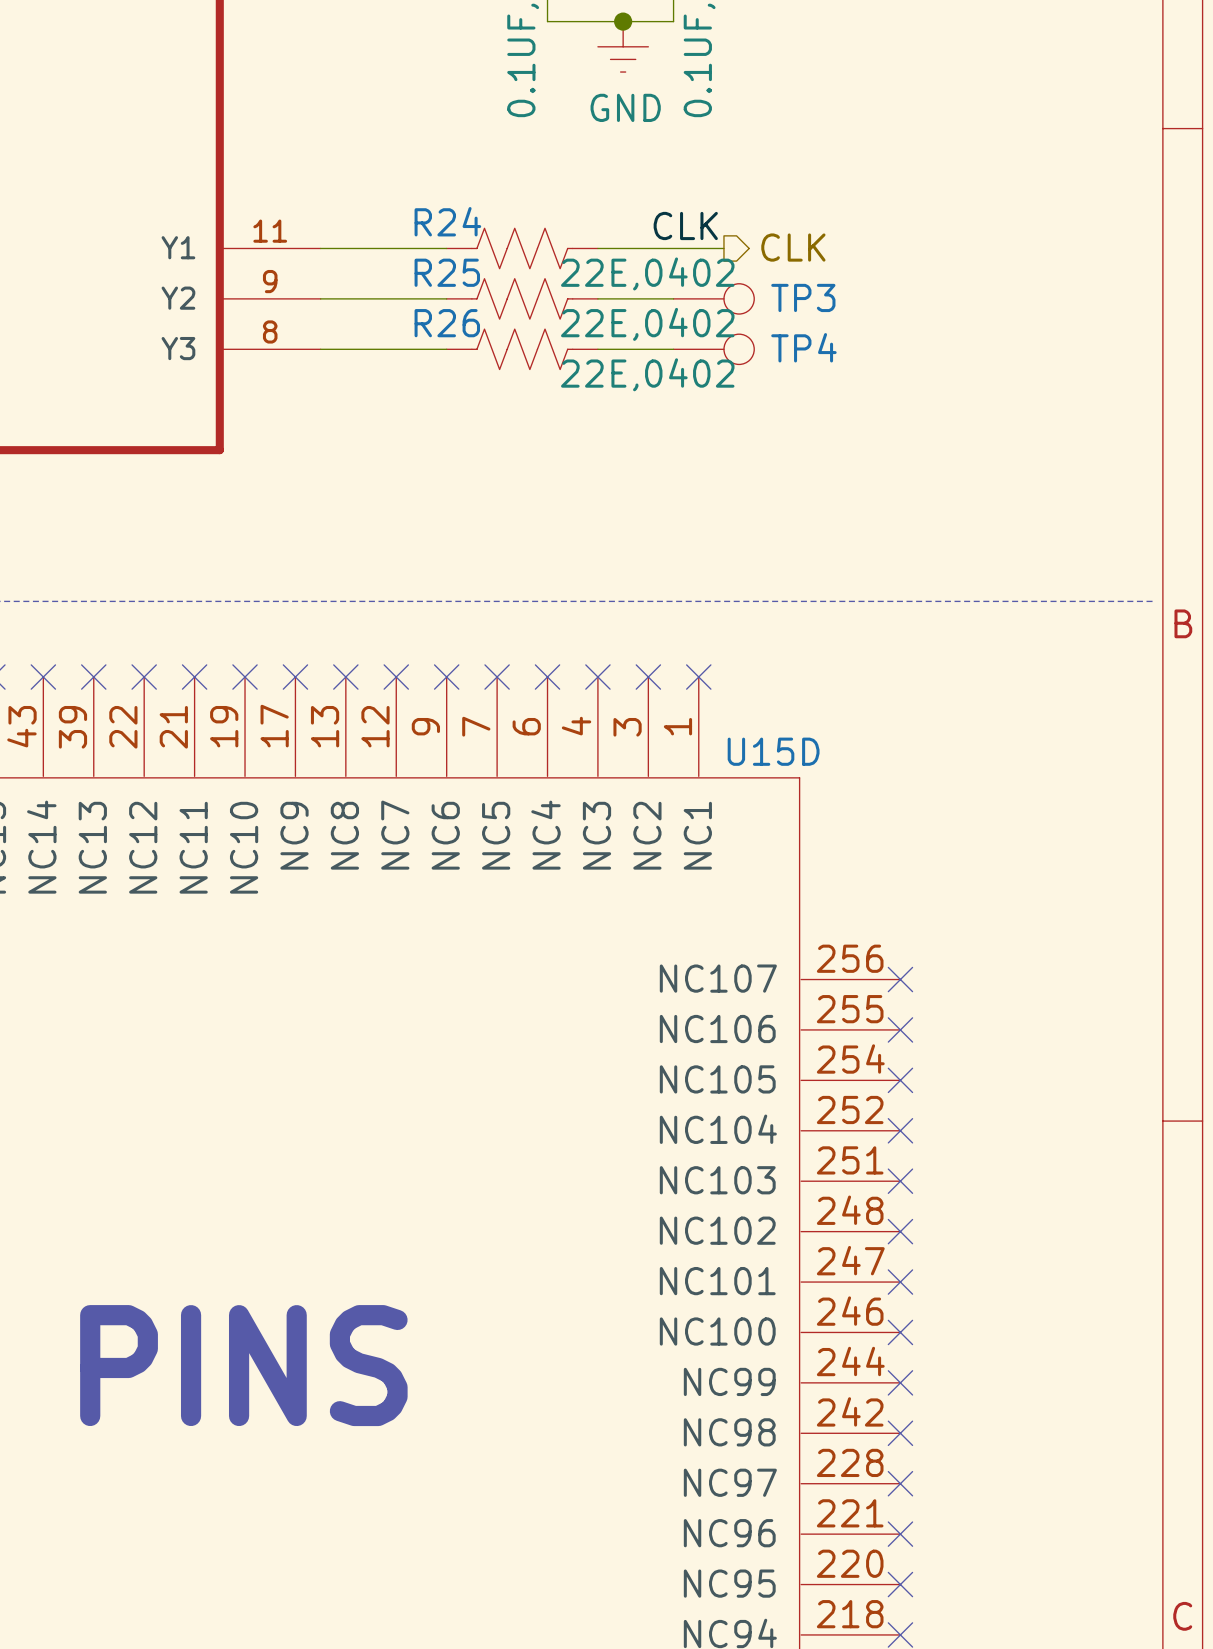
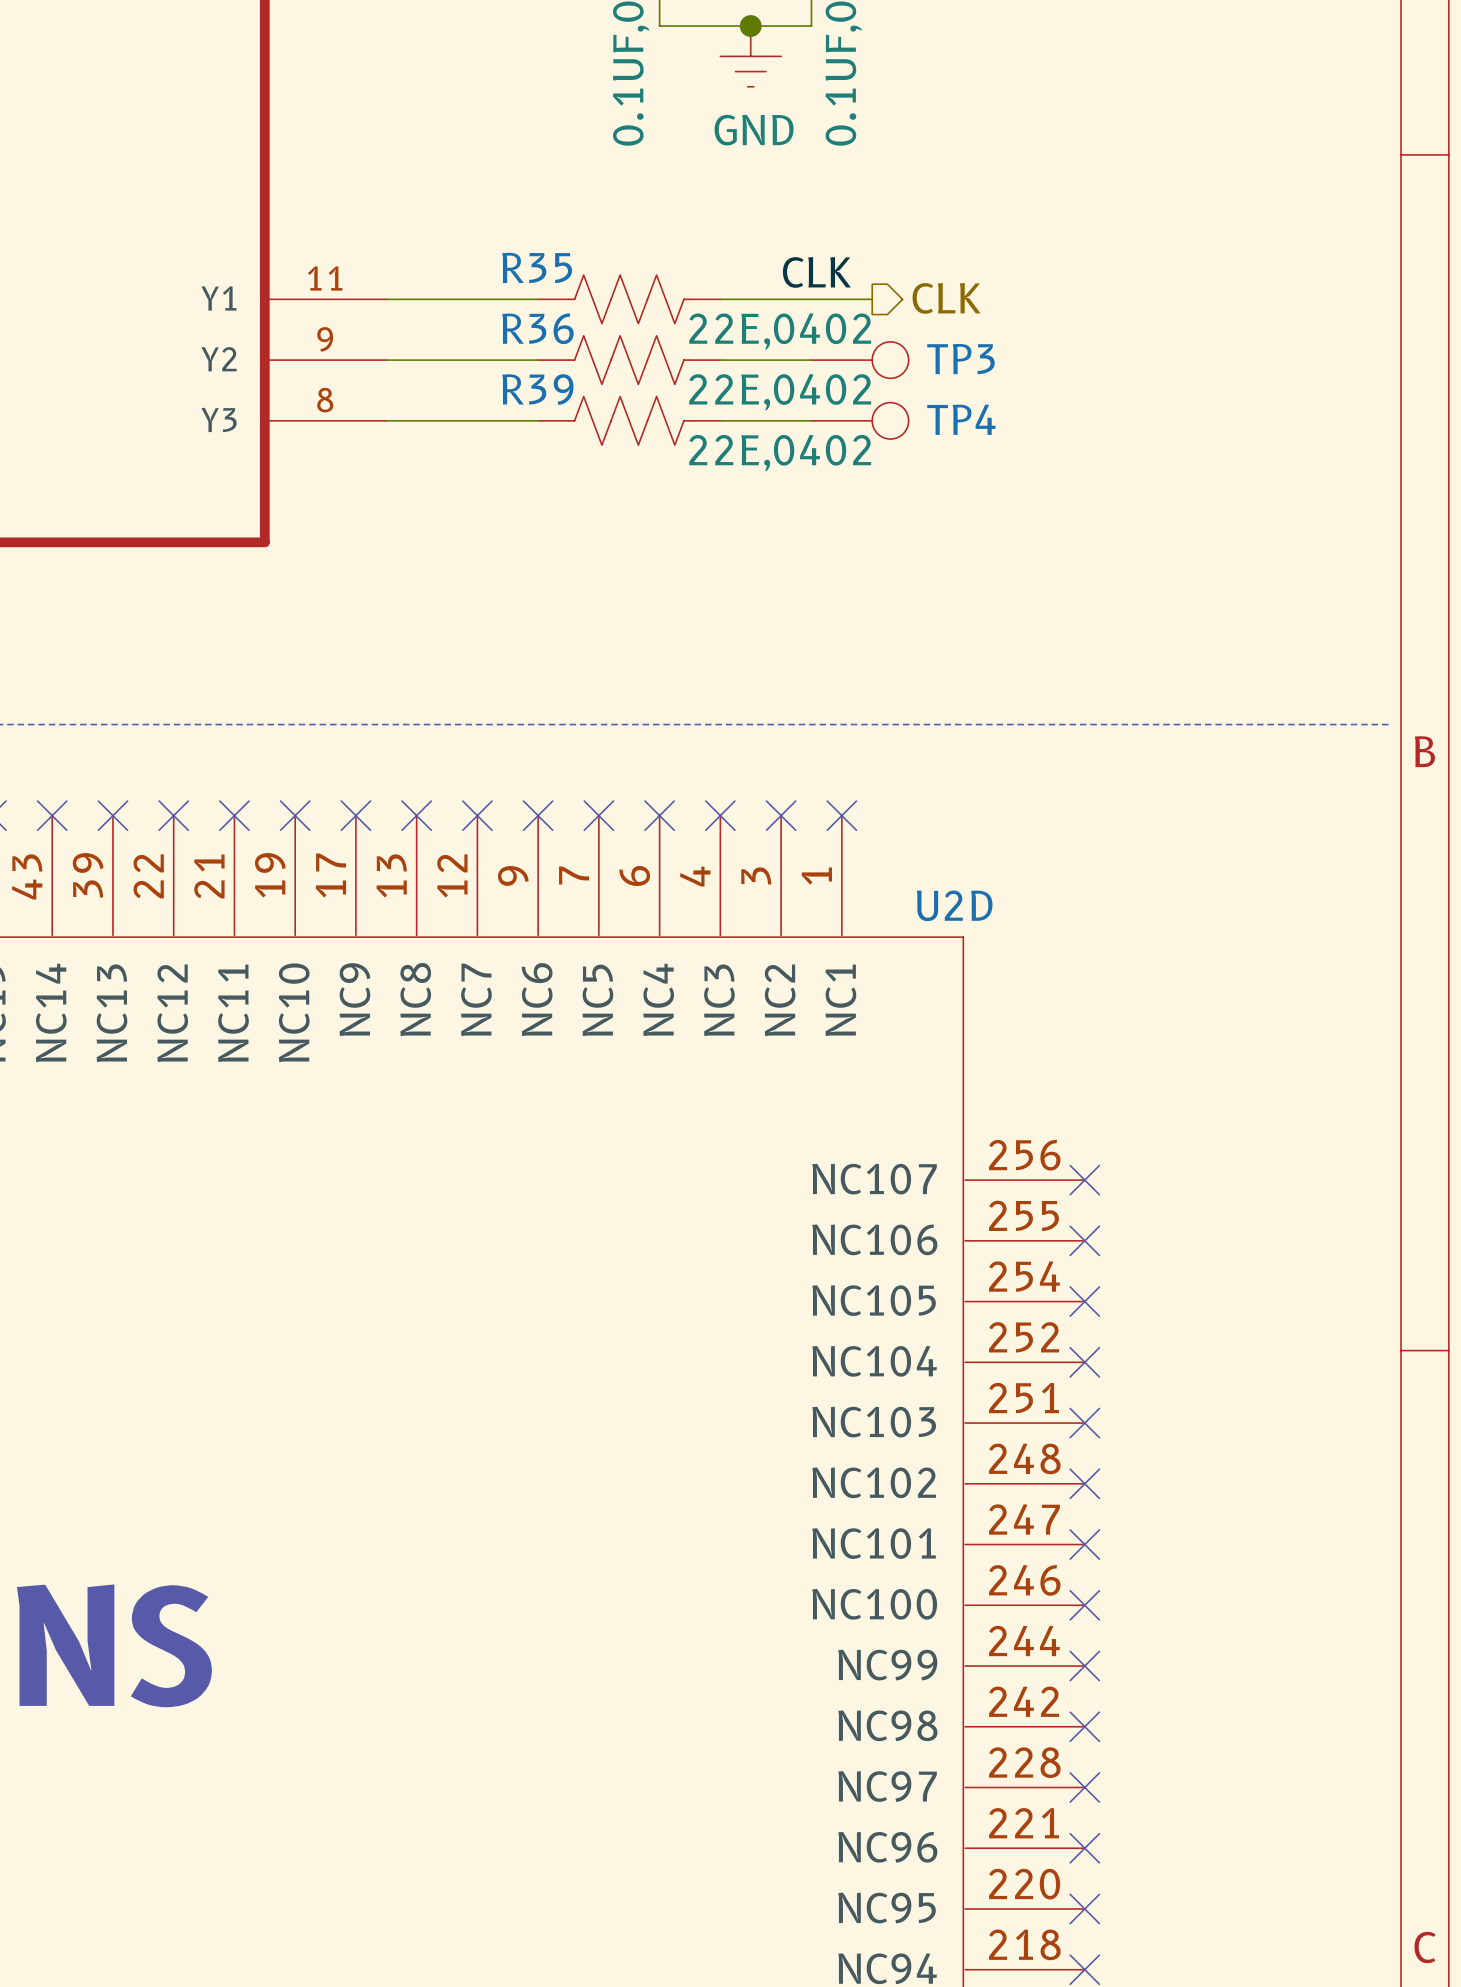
R24 name: R24 (447, 221) -> R35 (537, 267)
R25 name: R25 (447, 272) -> R36 (537, 328)
R26 name: R26 (447, 323) -> R39 (537, 389)
U15D name: U15D (773, 751) -> U2D (954, 905)

